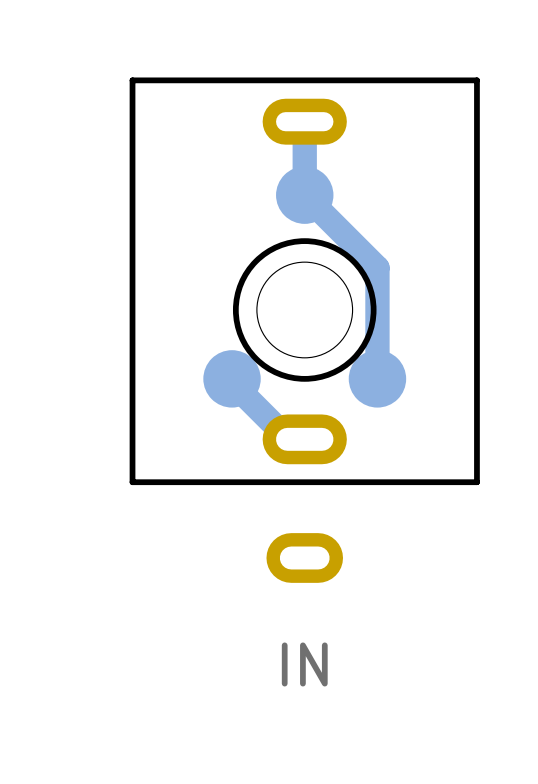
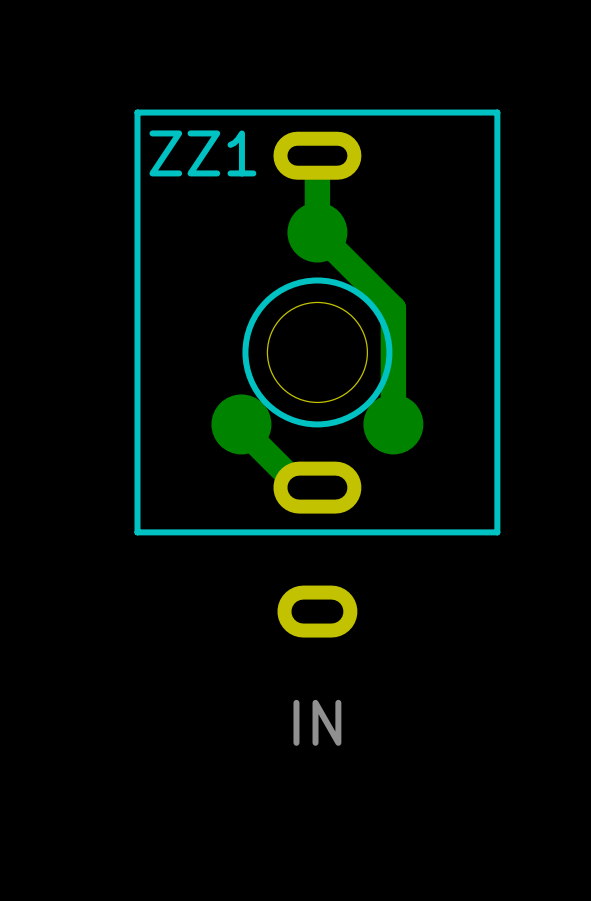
ZZ1 name: none -> ZZ1 (202, 153)

